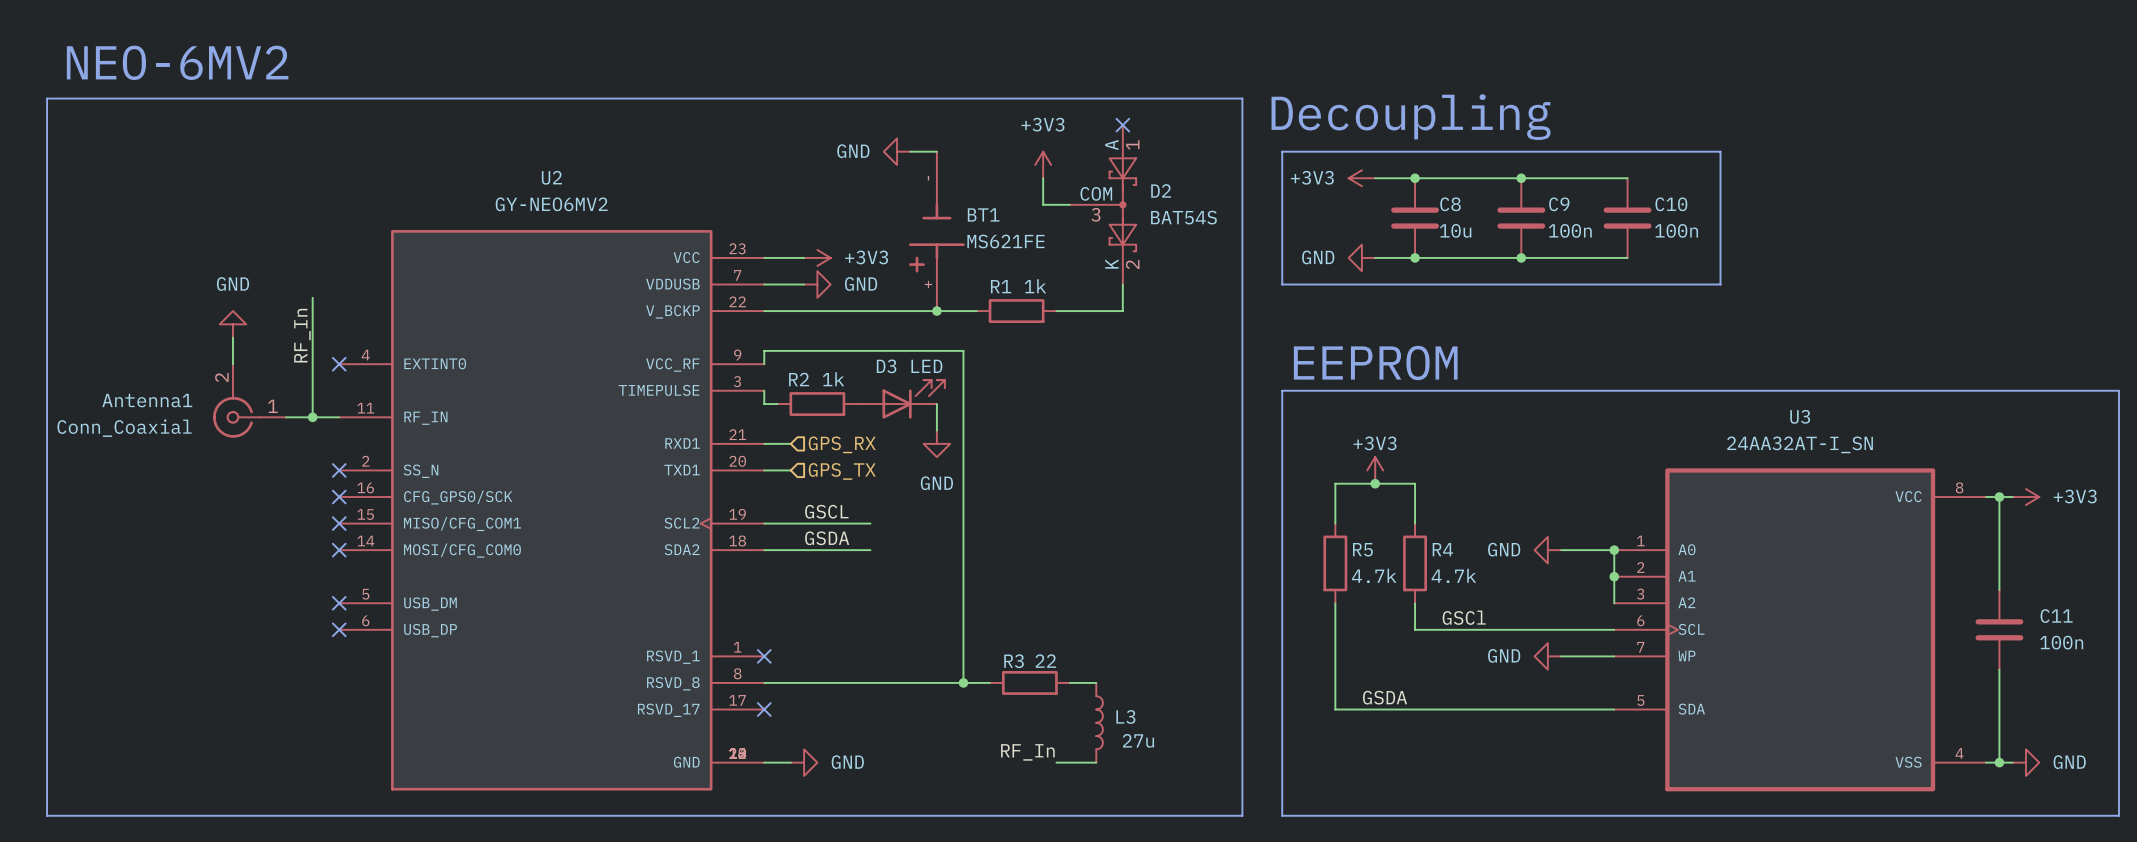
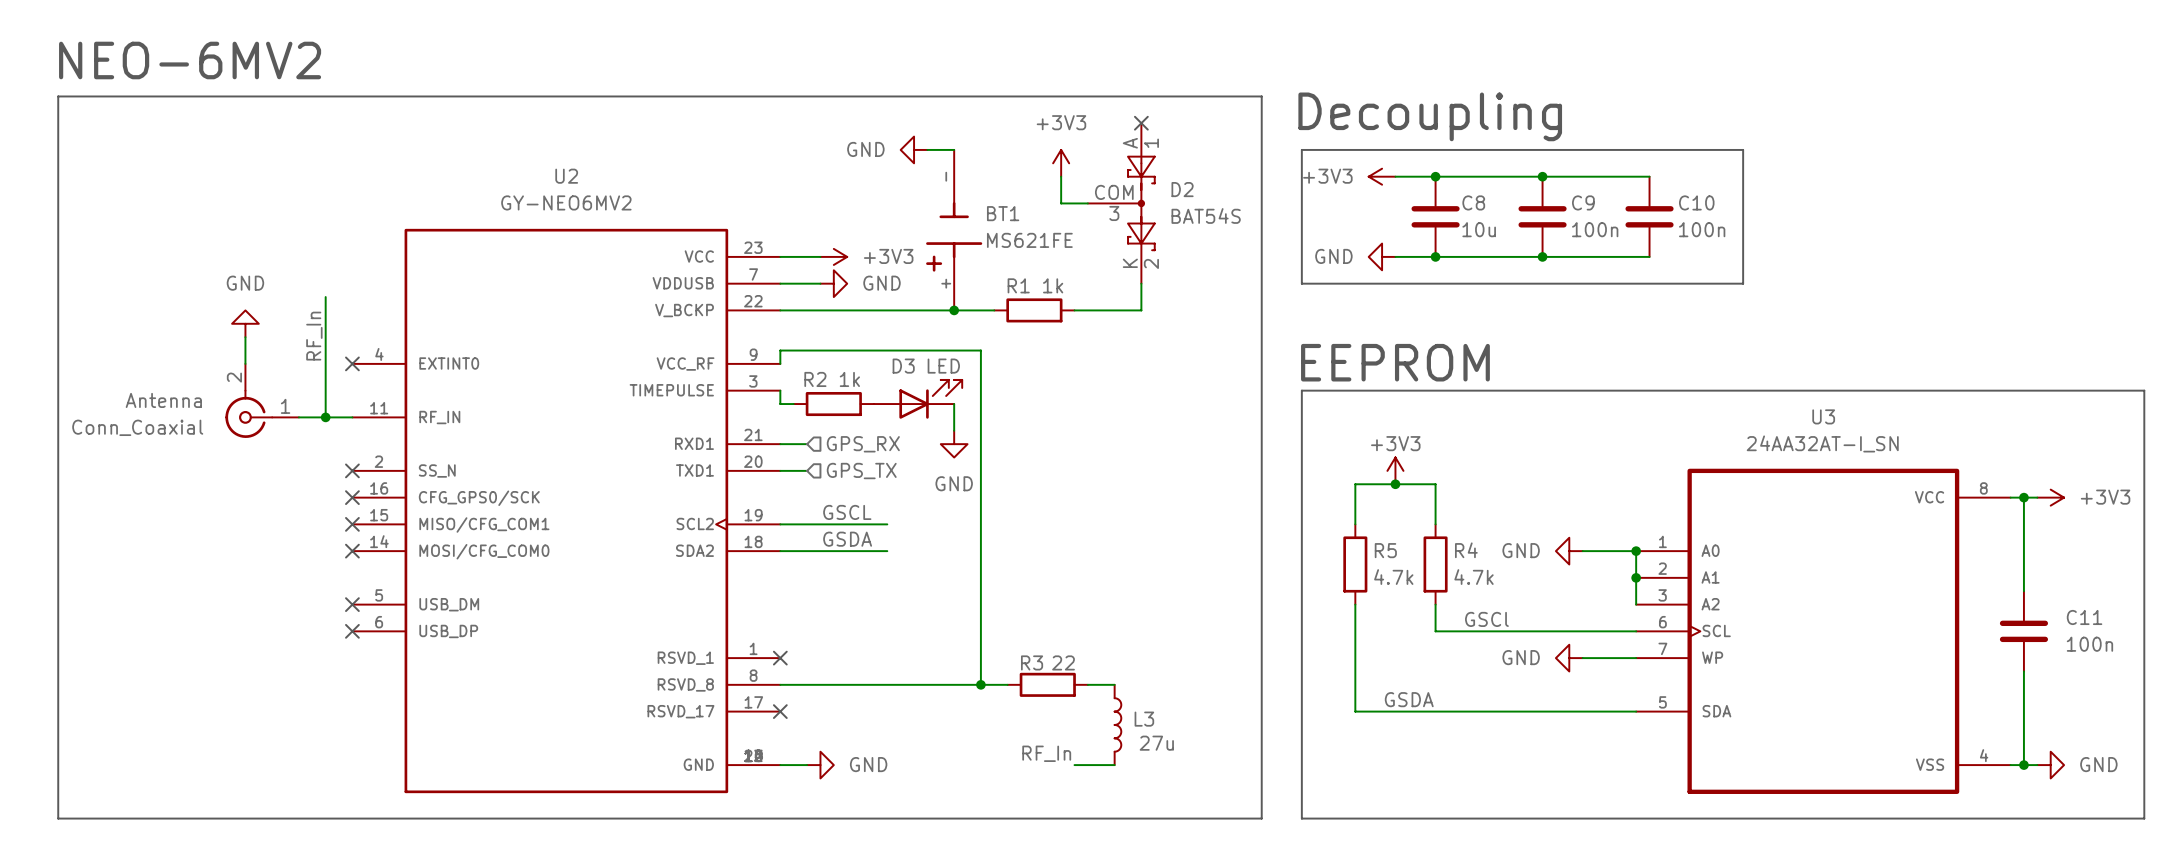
Antenna1 name: Antenna1 (147, 400) -> Antenna (163, 400)

